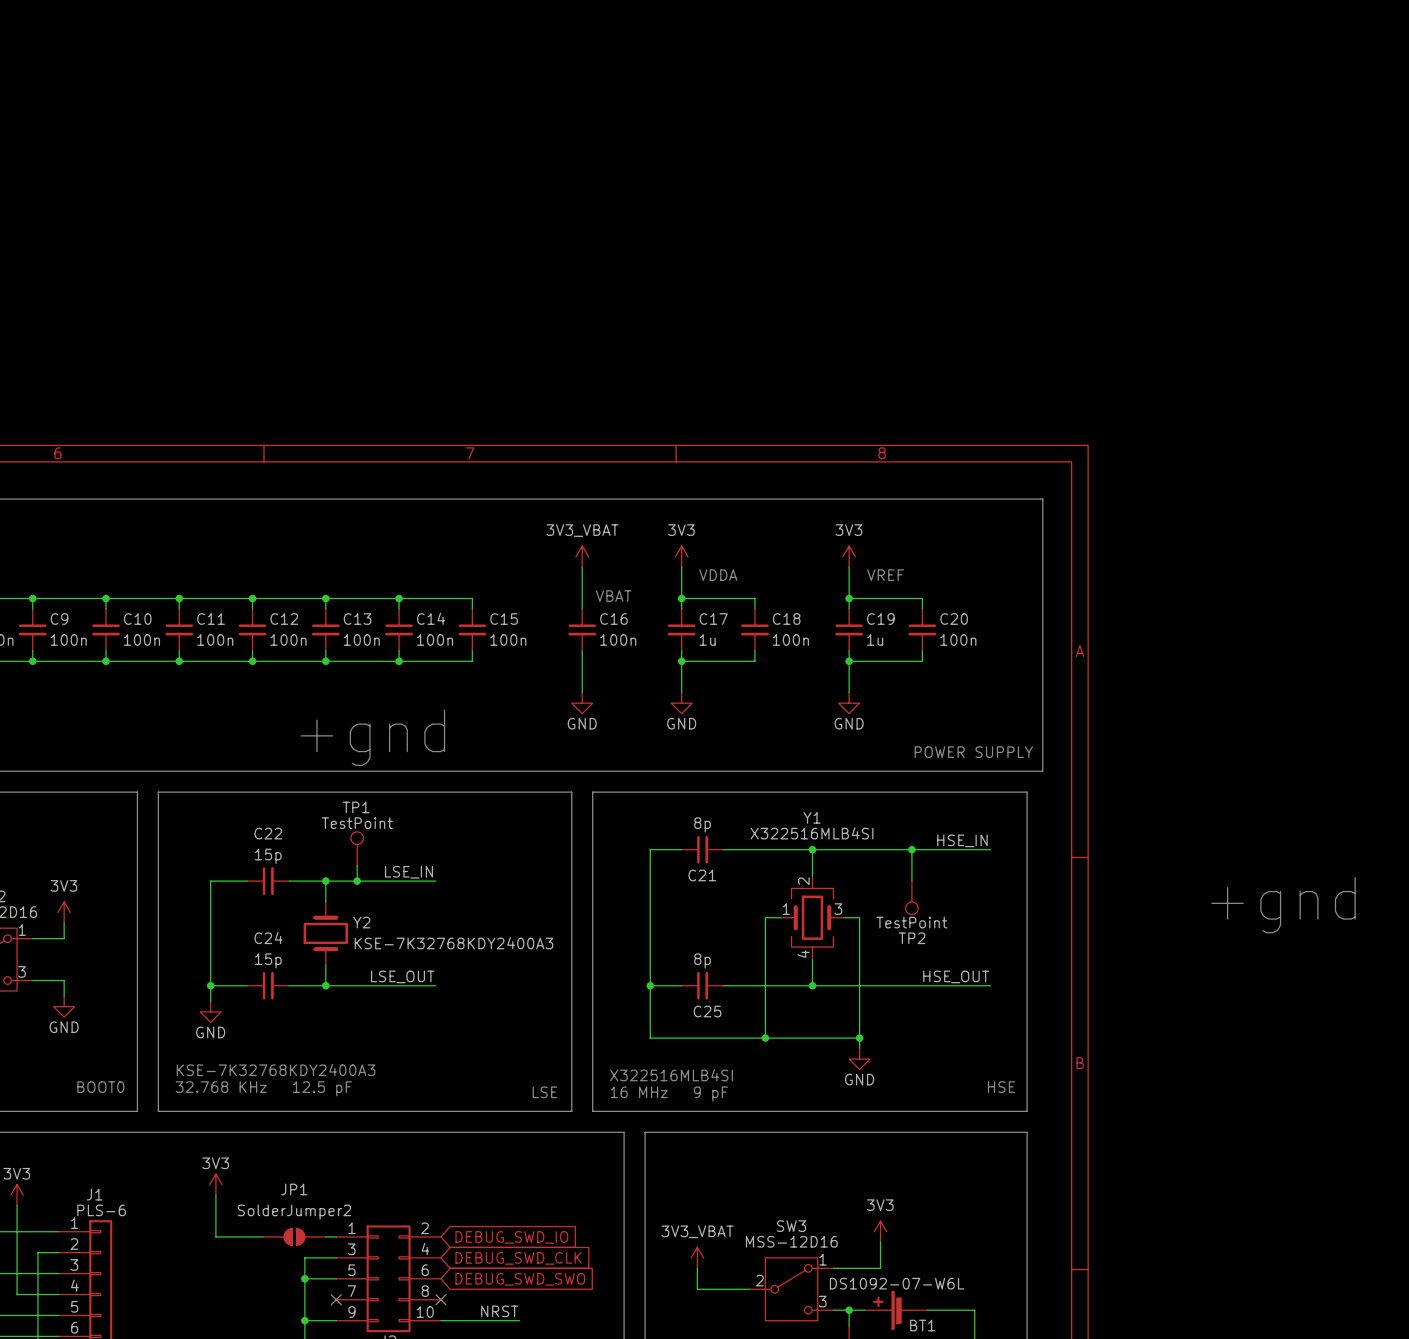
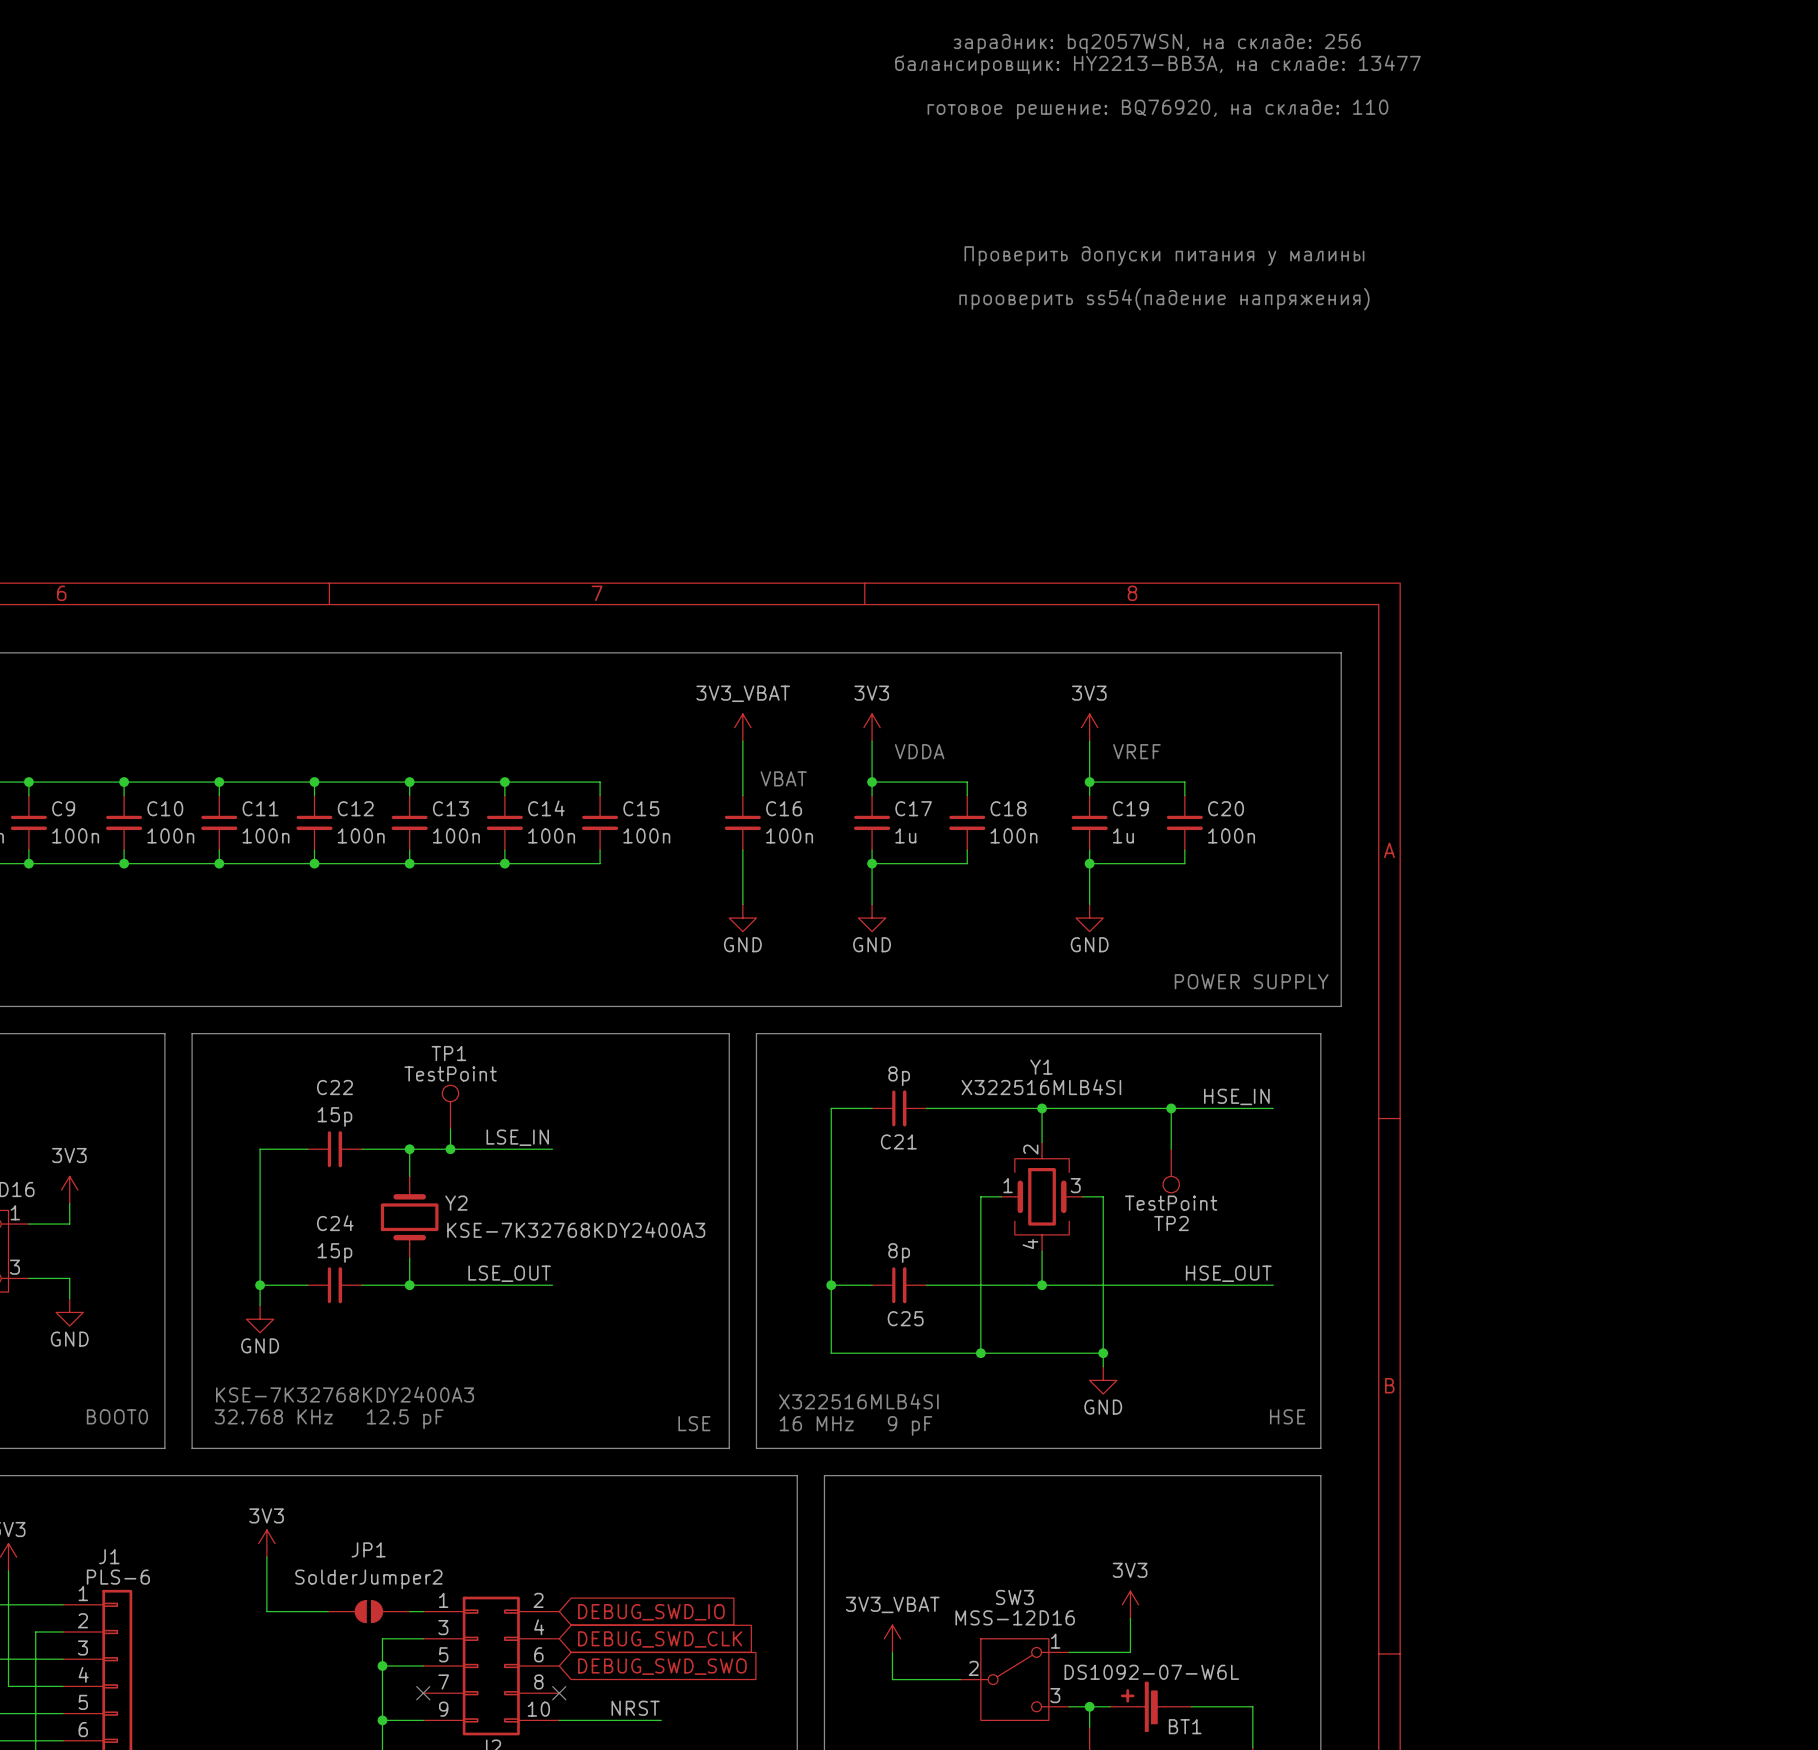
text: none -> зарадник: bq2057WSN, на складе: 256 (1157, 43)
text: none -> балансировщик: HY2213-BB3A, на складе: 13477 (1157, 65)
text: none -> готовое решение: BQ76920, на складе: 110 (1157, 109)
text: none -> Проверить допуски питания у малины (1164, 256)
text: none -> прооверить ss54(падение напряжения) (1164, 299)
text: +gnd (372, 737) -> none
text: +gnd (1283, 905) -> none

